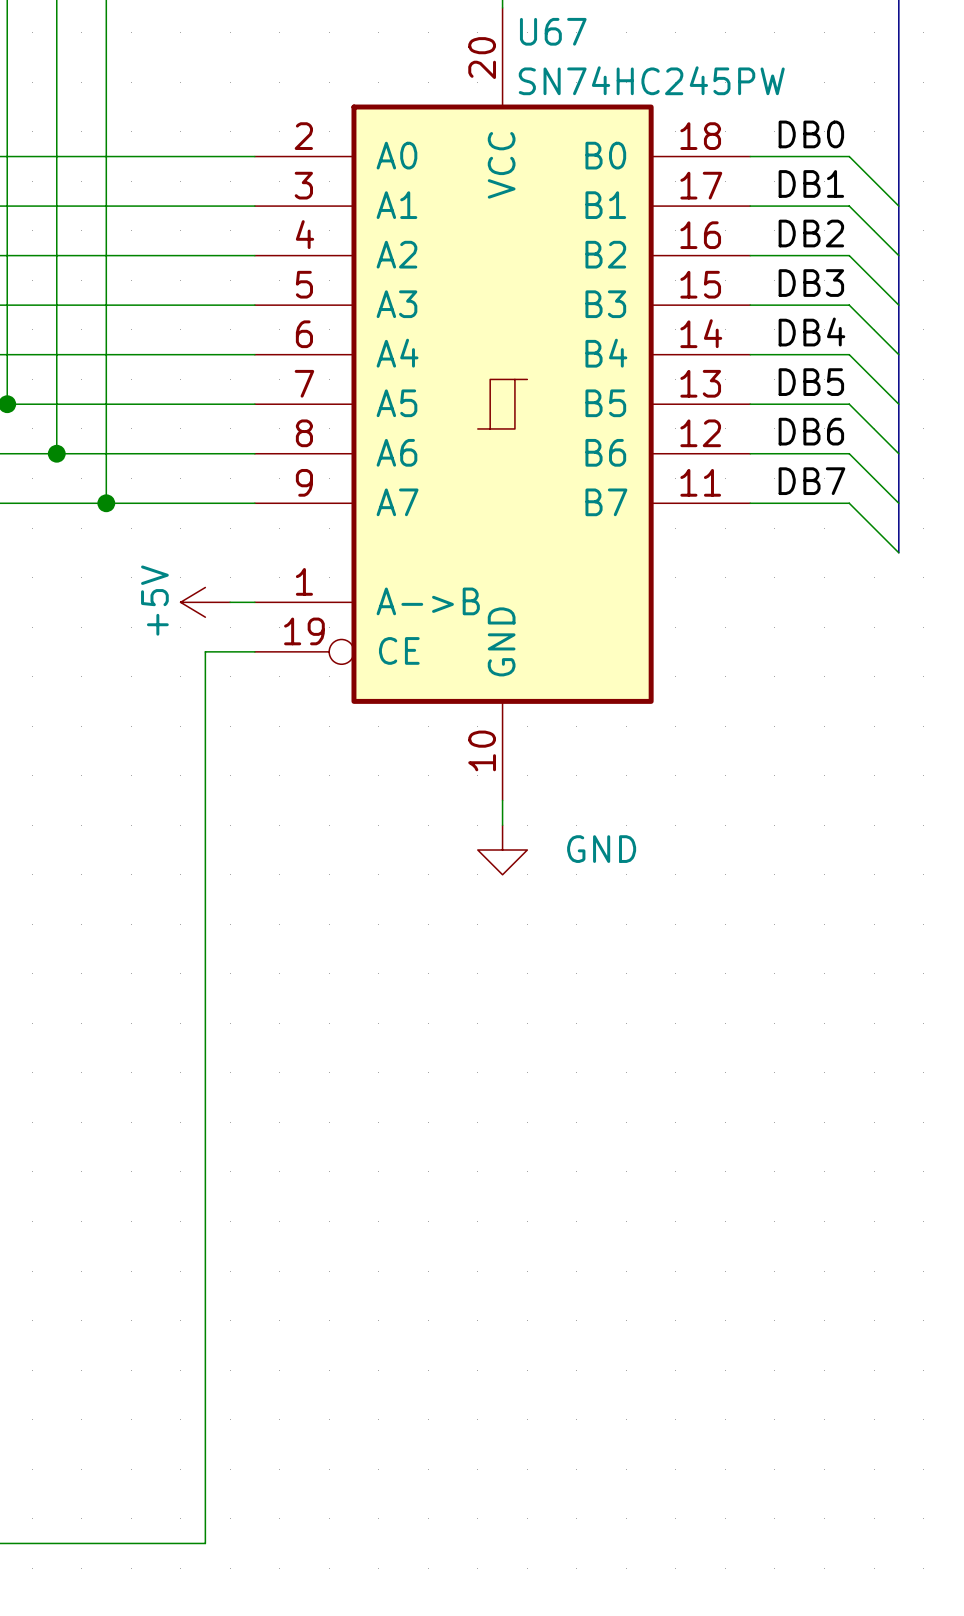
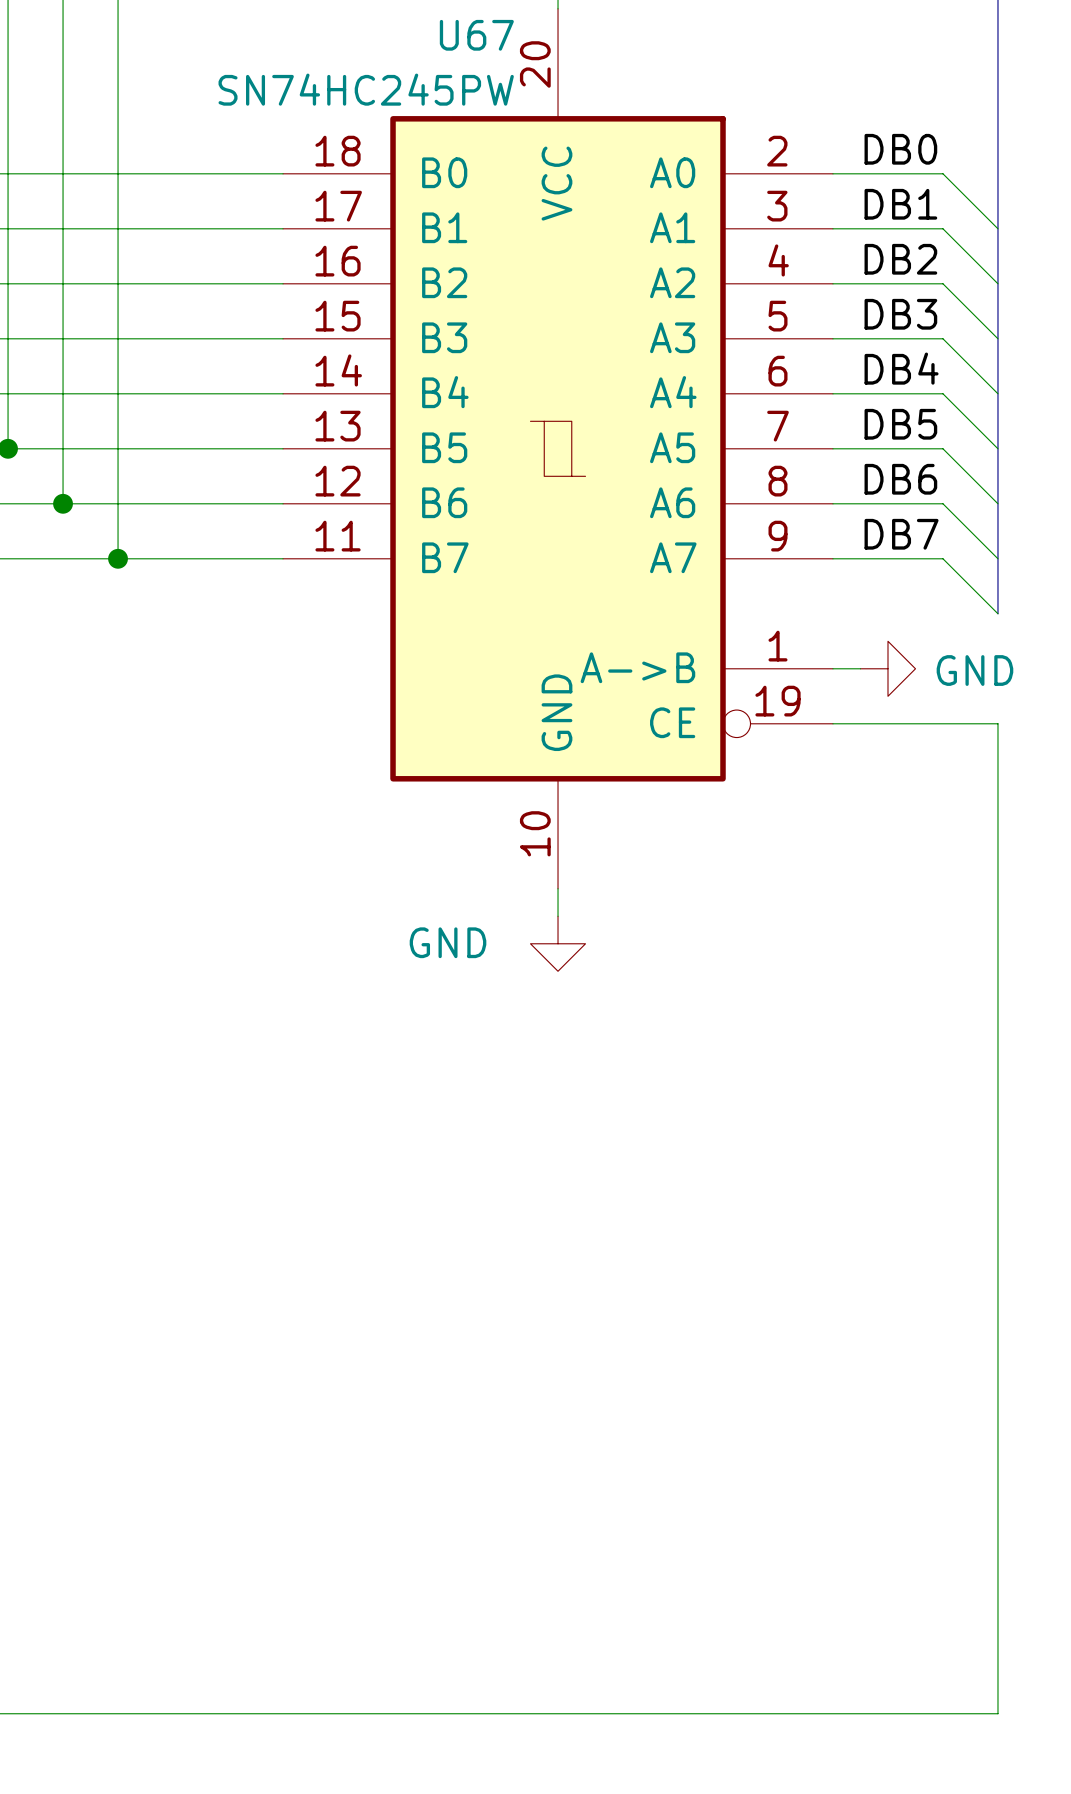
U67 flip: as is (502, 404) -> left-right (558, 448)
power symbol: +5V (205, 602) -> none
wire: (230, 602) (254, 602) -> none
wire: none -> (832, 668) (860, 668)
power symbol: none -> GND (887, 668)
wire: (254, 651) (205, 651) (205, 1543) -> (832, 723) (997, 723) (997, 1713) (228, 1713)
power symbol text position: GND (601, 849) -> GND (448, 942)

